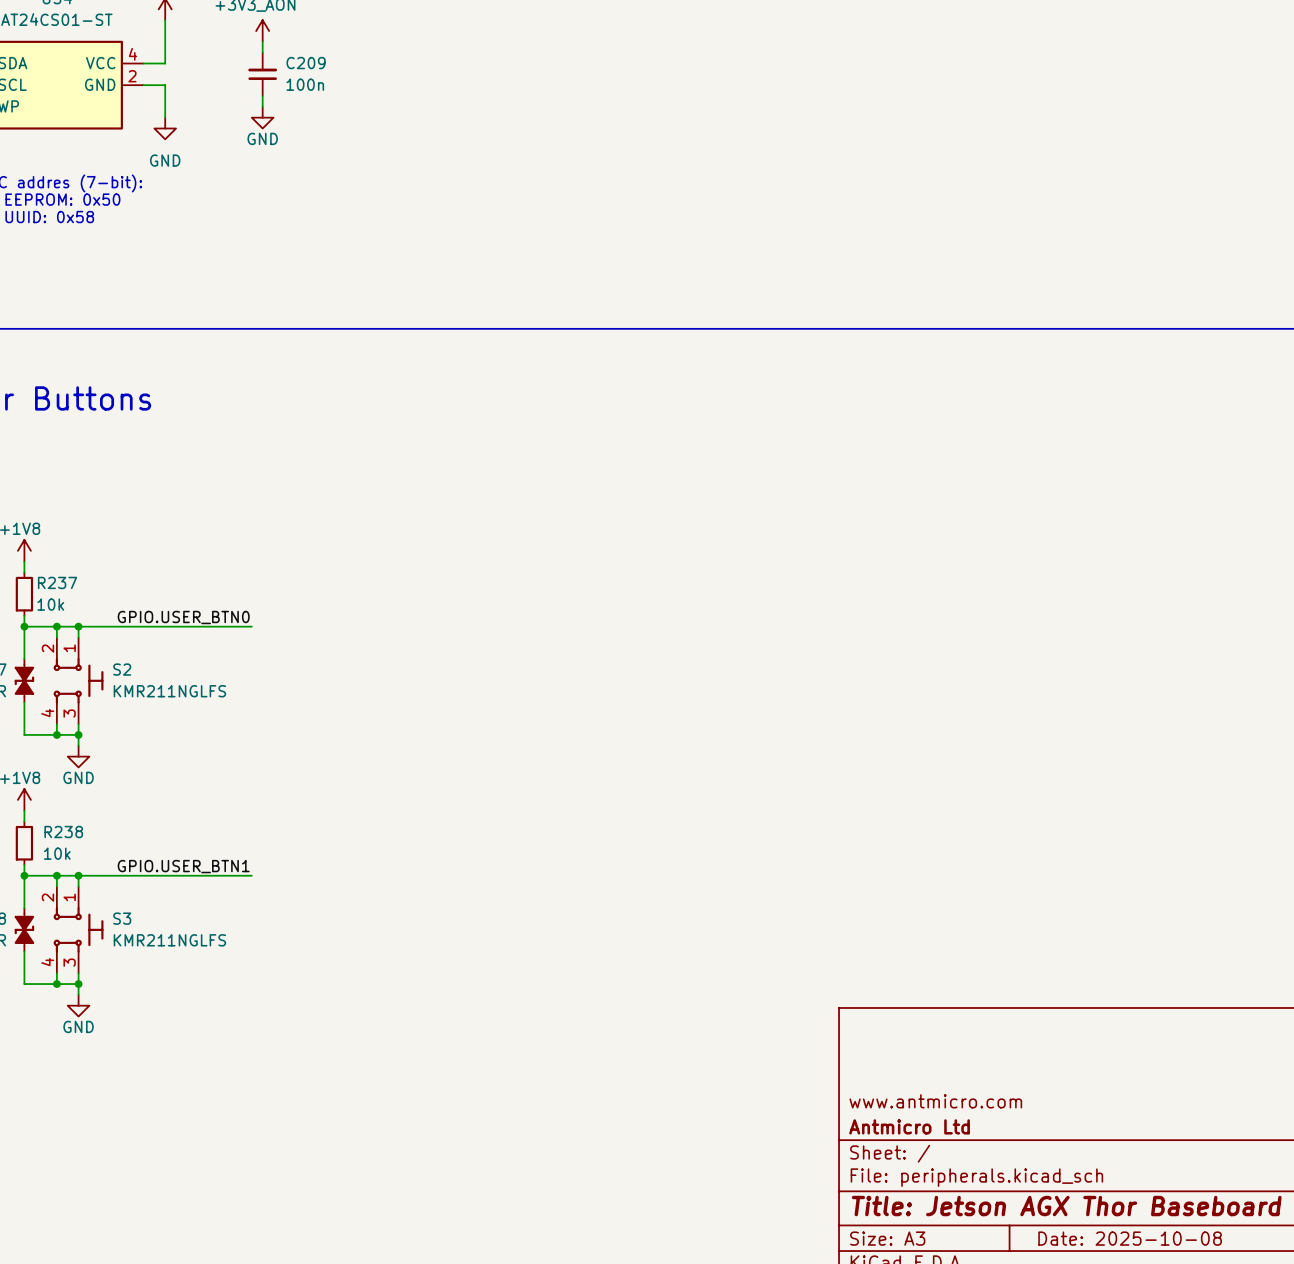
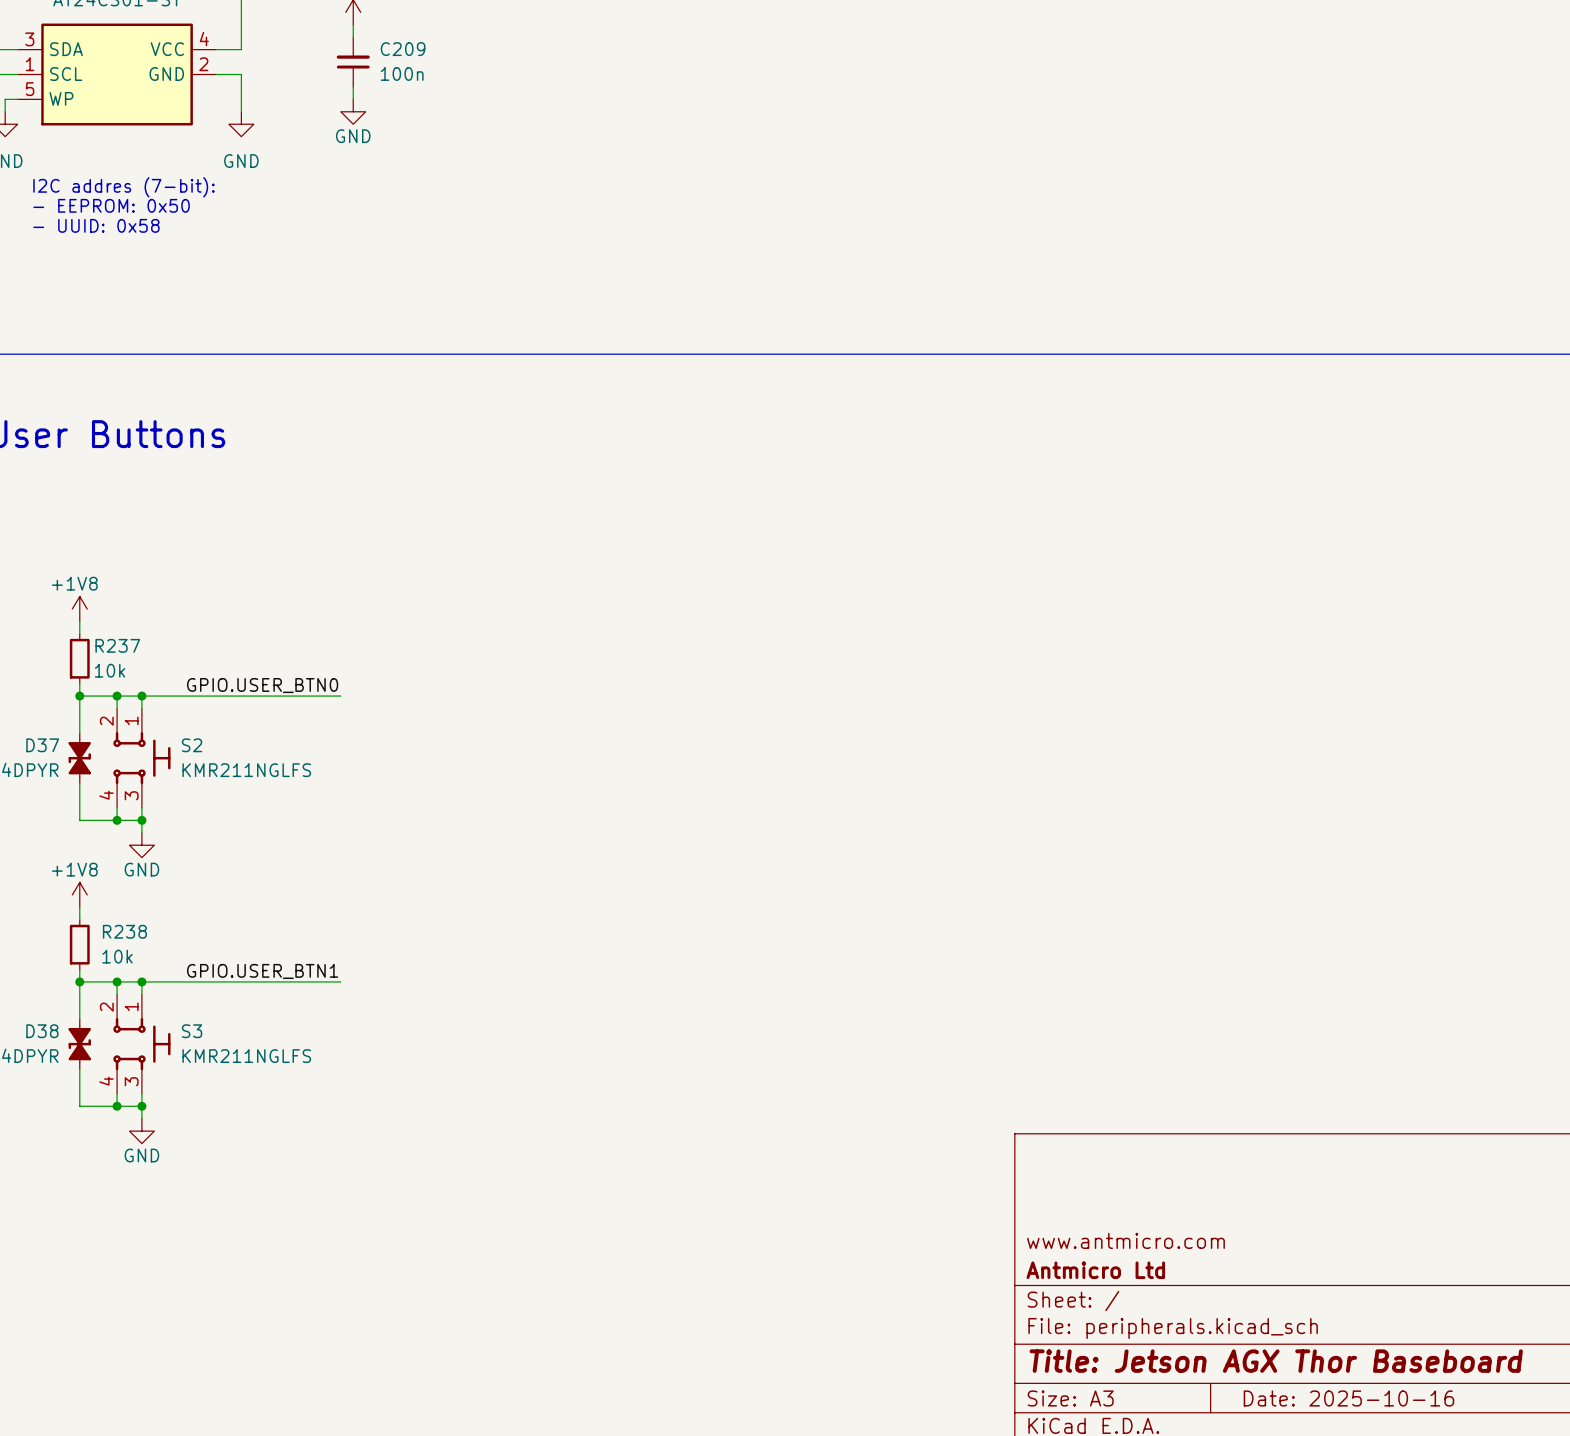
title block: Date: 2025-10-08 (1130, 1238) -> Date: 2025-10-16 (1348, 1398)

